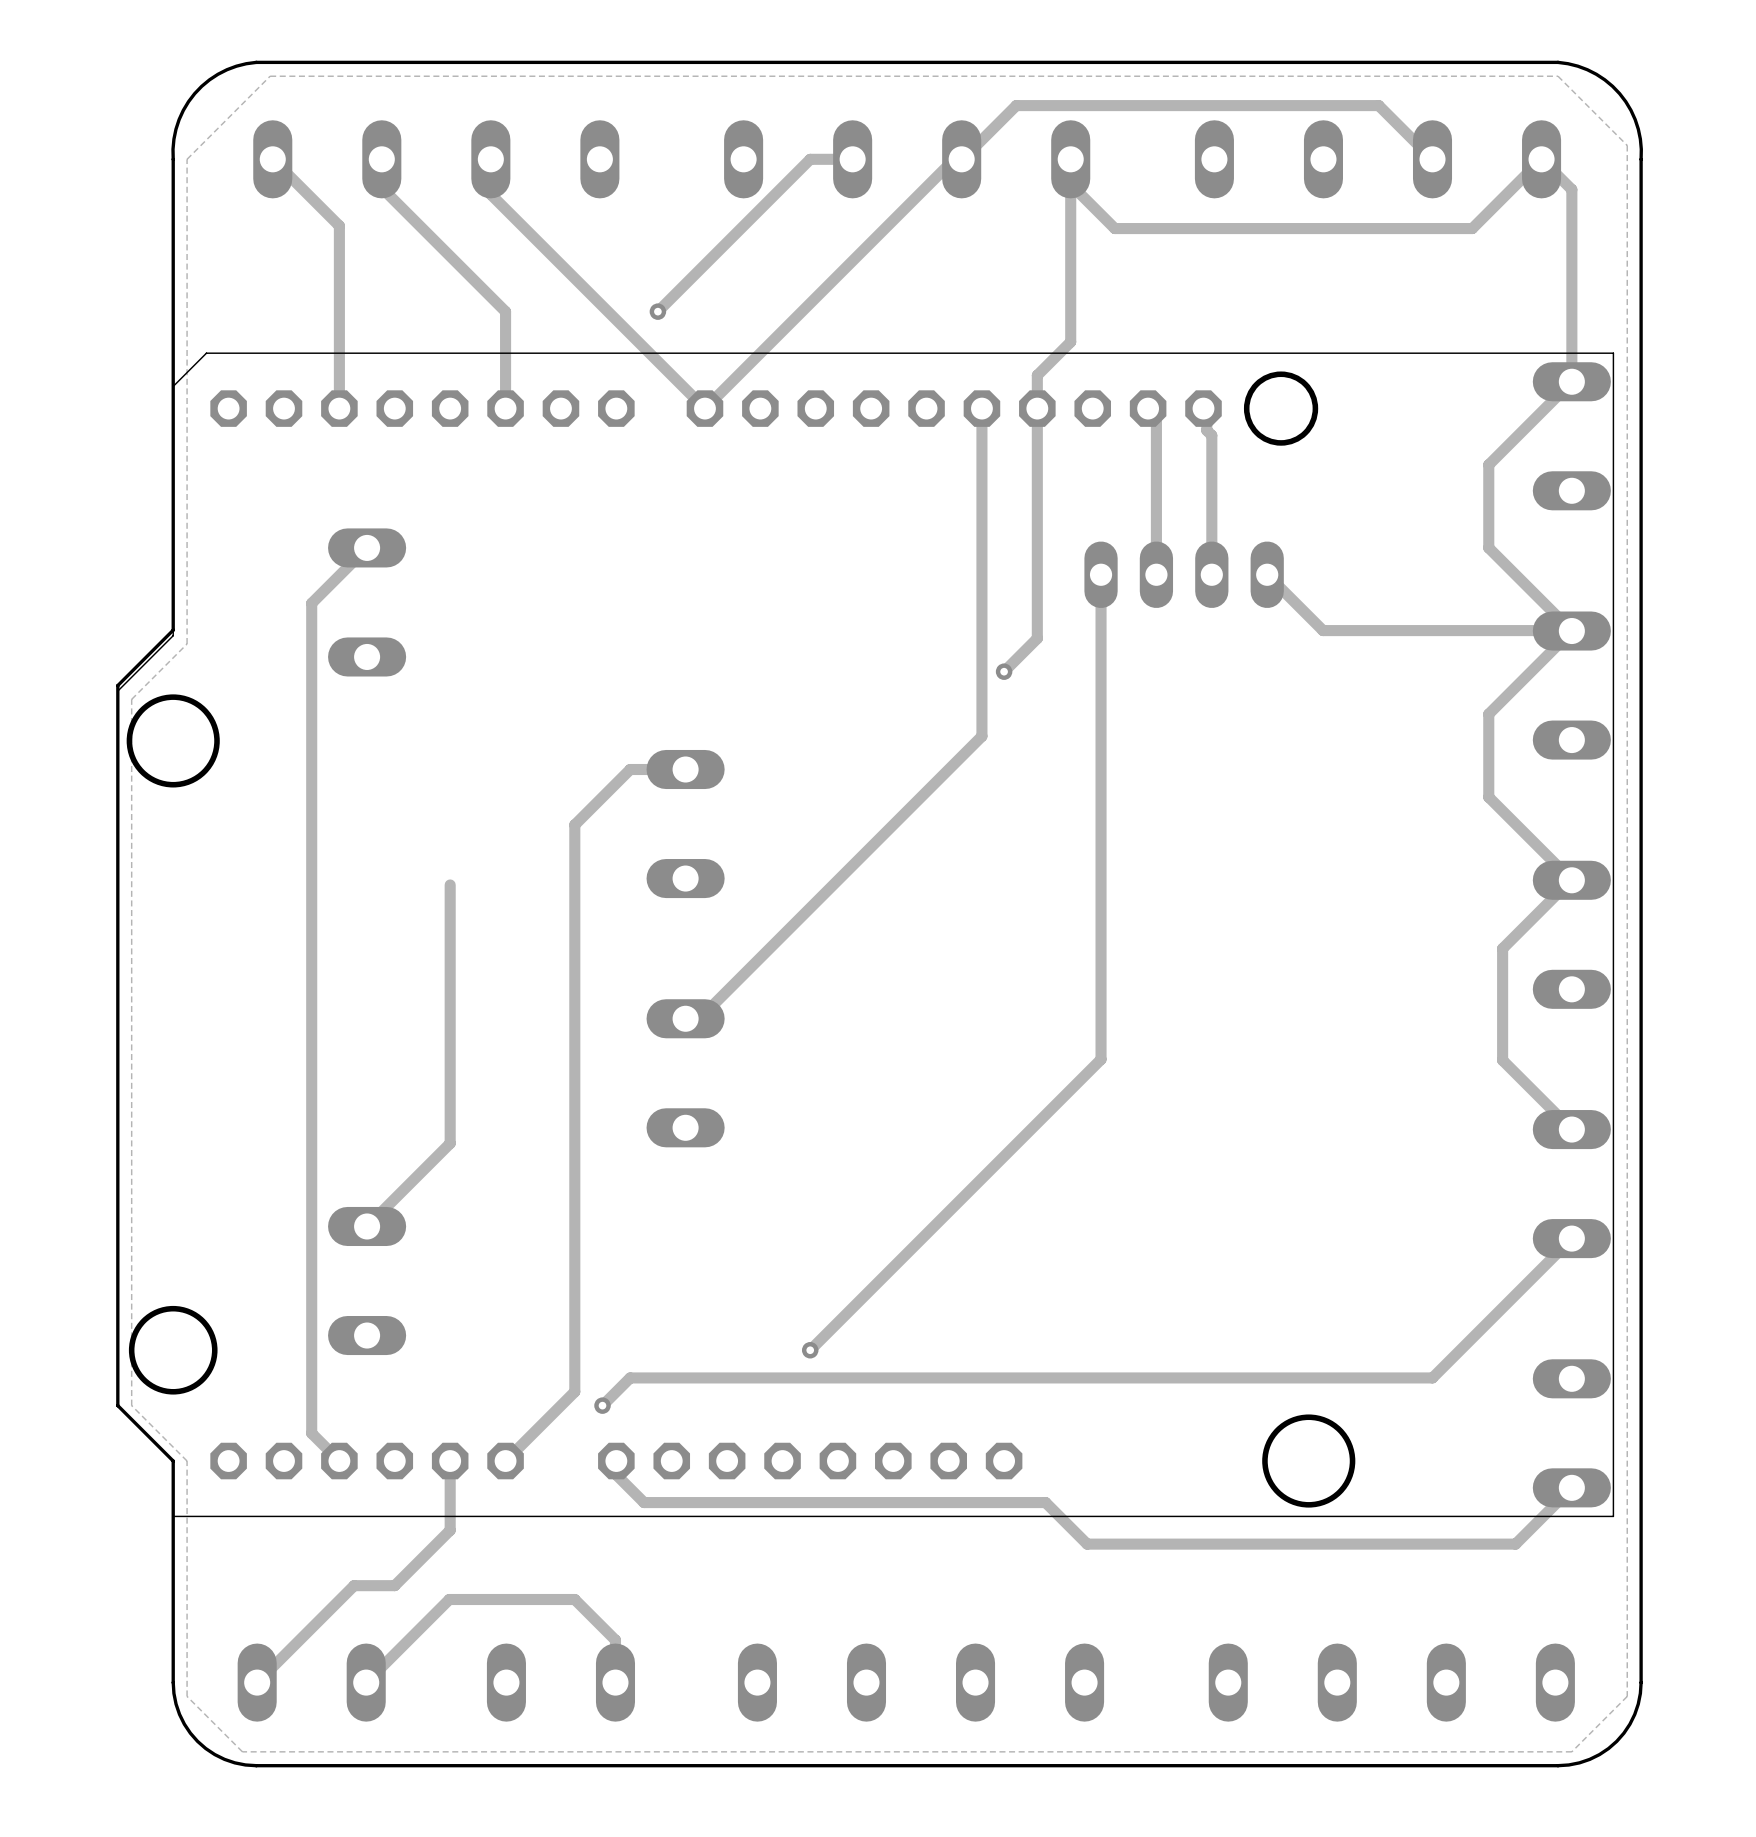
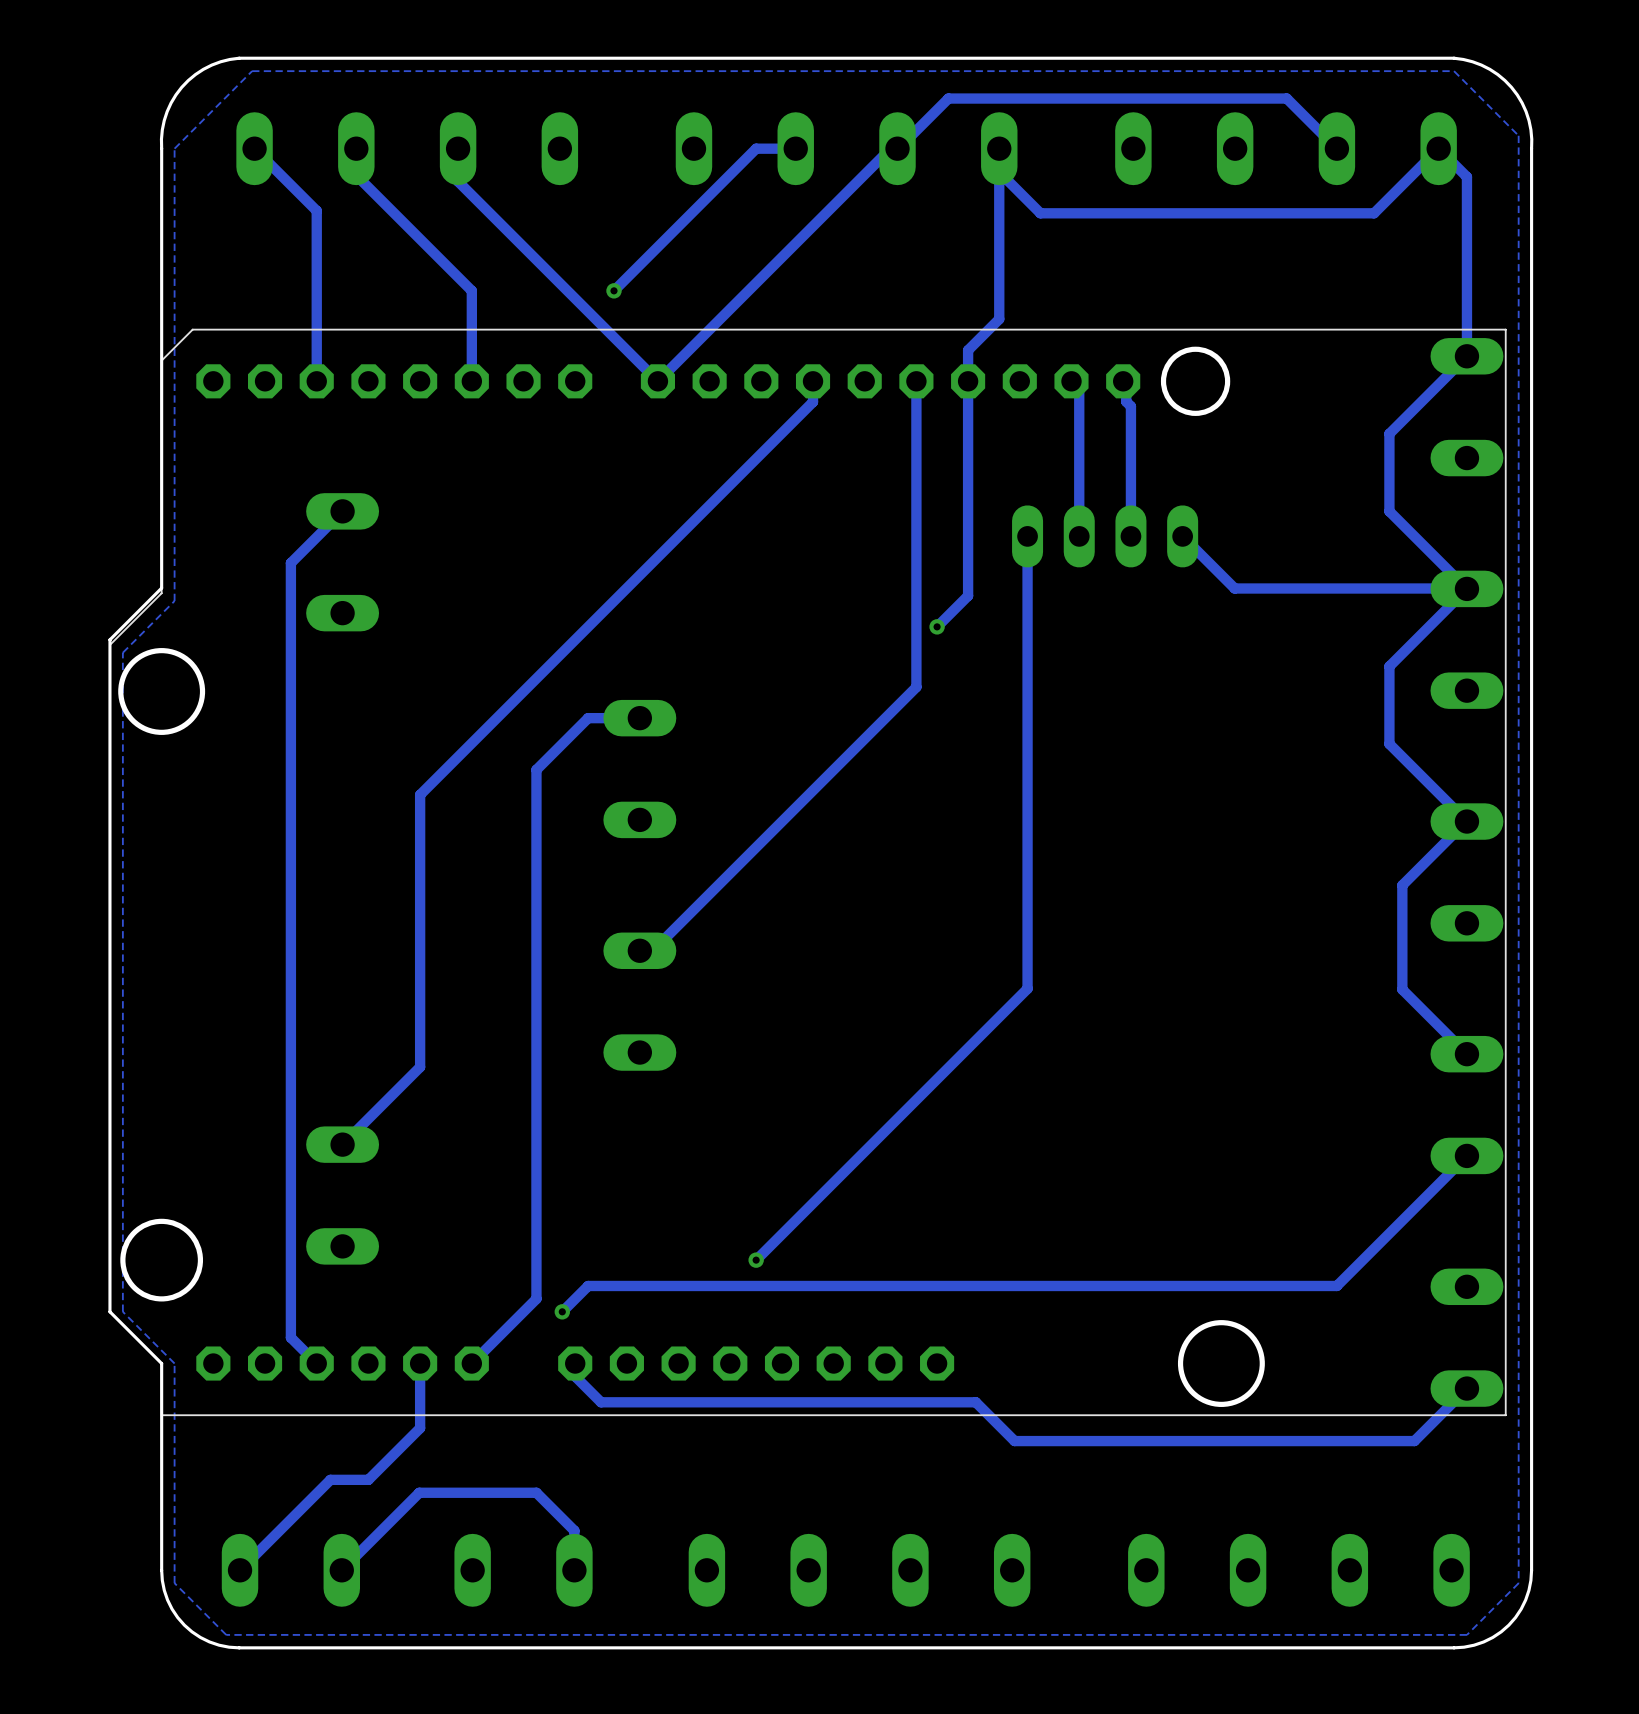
track: none -> (813, 381) (813, 401) (420, 794) (420, 825)

